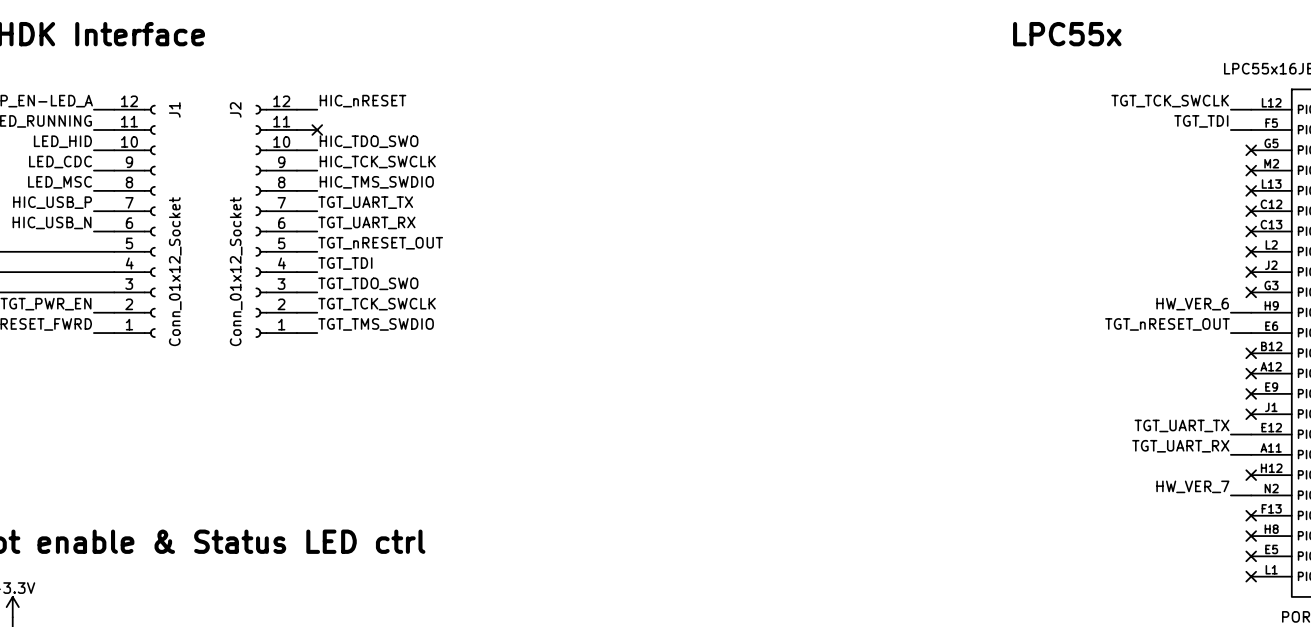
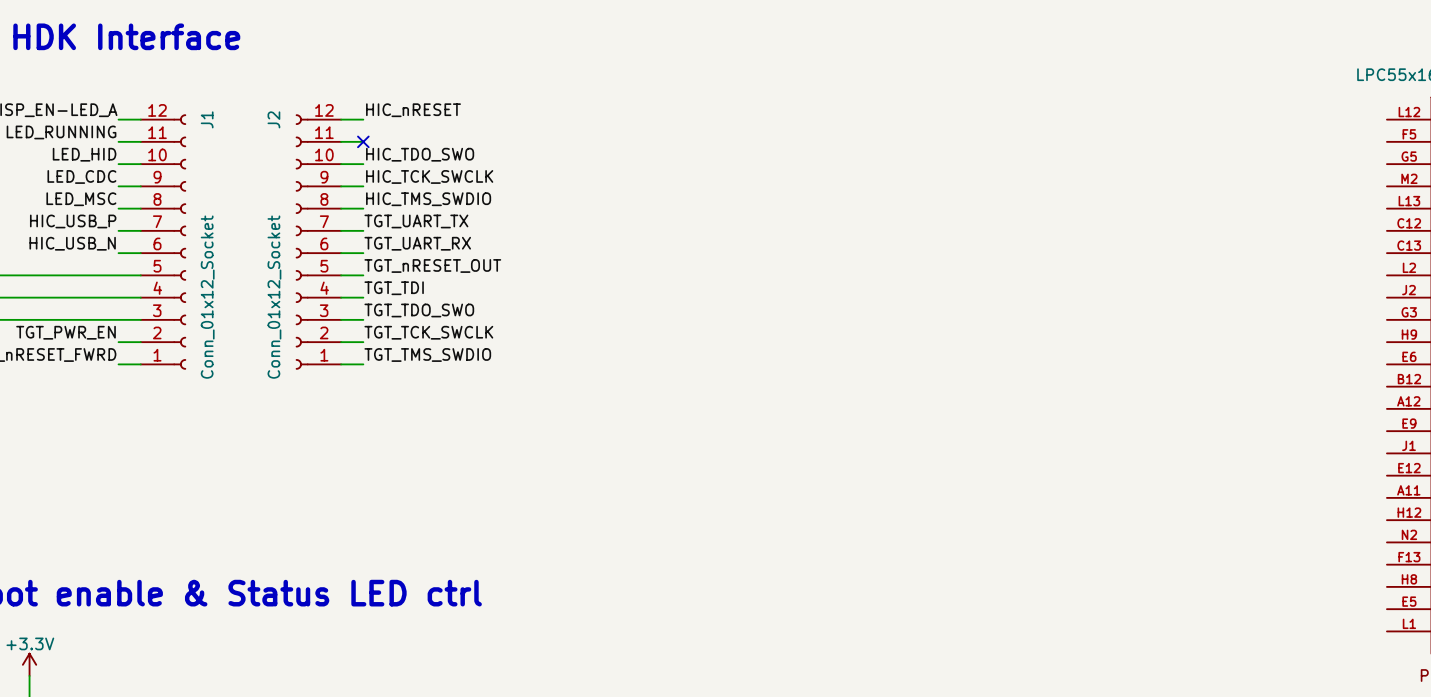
text: LPC55x (1067, 34) -> none
label: TGT_TCK_SWCLK (1170, 101) -> none
wire: (1230, 109) (1251, 109) -> none
label: TGT_TDI (1201, 121) -> none
wire: (1230, 129) (1251, 129) -> none
no-connect mark: (1251, 150) -> none
no-connect mark: (1251, 170) -> none
no-connect mark: (1251, 190) -> none
no-connect mark: (1251, 211) -> none
no-connect mark: (1251, 231) -> none
no-connect mark: (1251, 251) -> none
no-connect mark: (1251, 272) -> none
no-connect mark: (1251, 292) -> none
label: HW_VER_6 (1192, 304) -> none
wire: (1230, 312) (1251, 312) -> none
label: TGT_nRESET_OUT (1167, 324) -> none
wire: (1230, 333) (1251, 333) -> none
no-connect mark: (1251, 353) -> none
no-connect mark: (1251, 373) -> none
no-connect mark: (1251, 393) -> none
no-connect mark: (1251, 414) -> none
label: TGT_UART_TX (1181, 425) -> none
wire: (1230, 434) (1251, 434) -> none
label: TGT_UART_RX (1180, 446) -> none
wire: (1230, 454) (1251, 454) -> none
no-connect mark: (1251, 475) -> none
label: HW_VER_7 (1192, 486) -> none
wire: (1230, 495) (1251, 495) -> none
no-connect mark: (1251, 515) -> none
no-connect mark: (1251, 536) -> none
no-connect mark: (1251, 556) -> none
no-connect mark: (1251, 576) -> none

